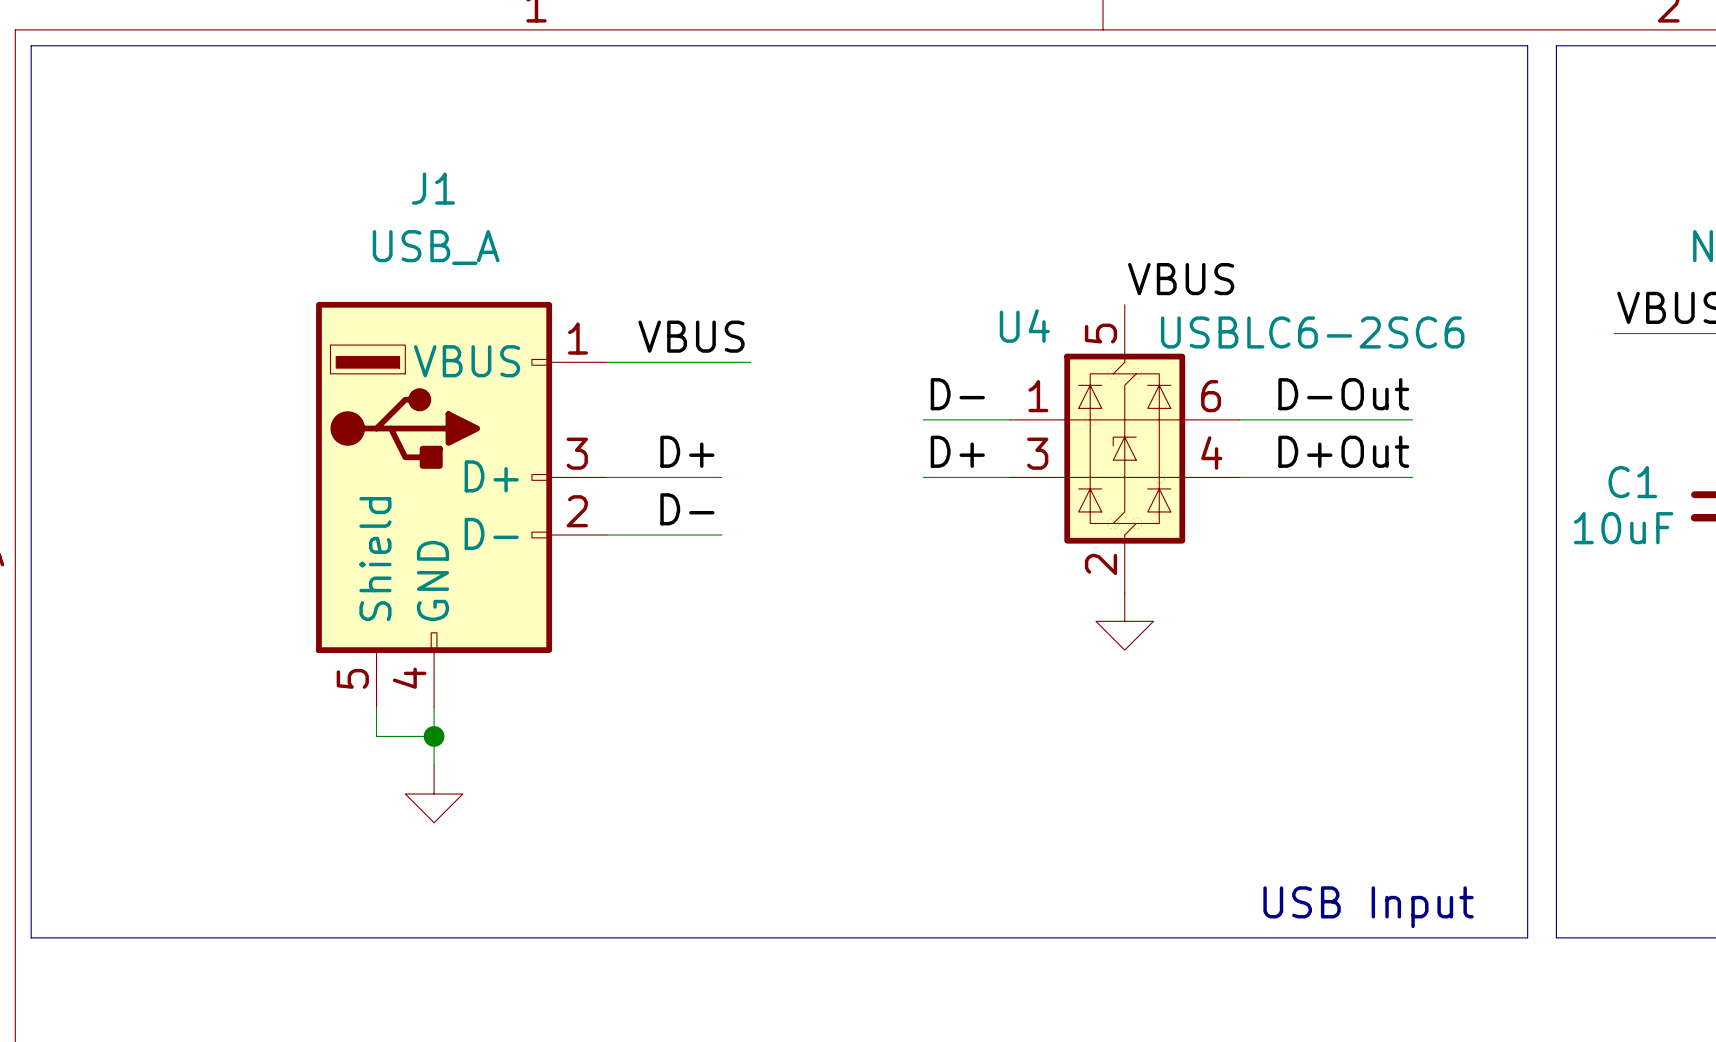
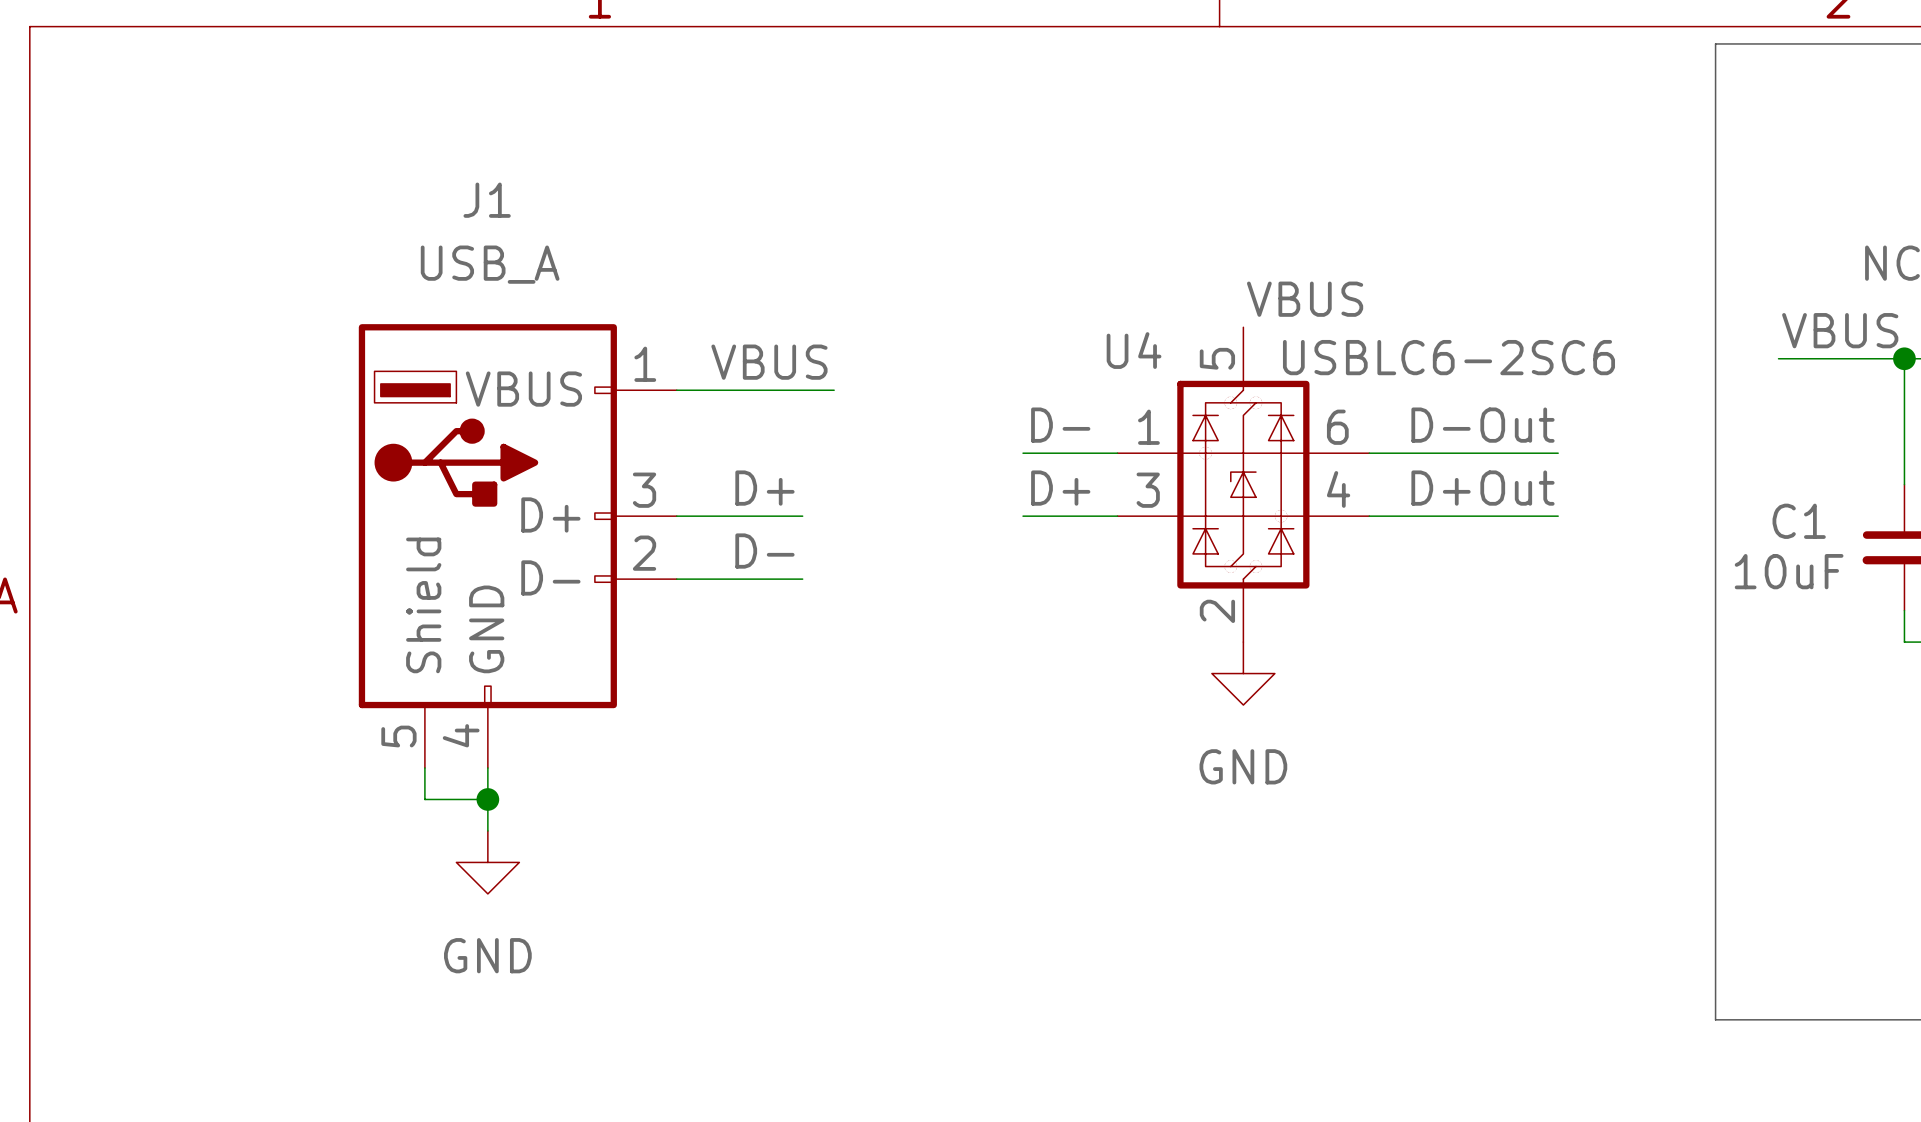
line: (31, 45) (1527, 45) (1527, 937) (31, 937) (31, 45) -> none
power symbol text: none -> GND (1243, 766)
power symbol text: none -> GND (487, 955)
text: USB Input (1368, 907) -> none

